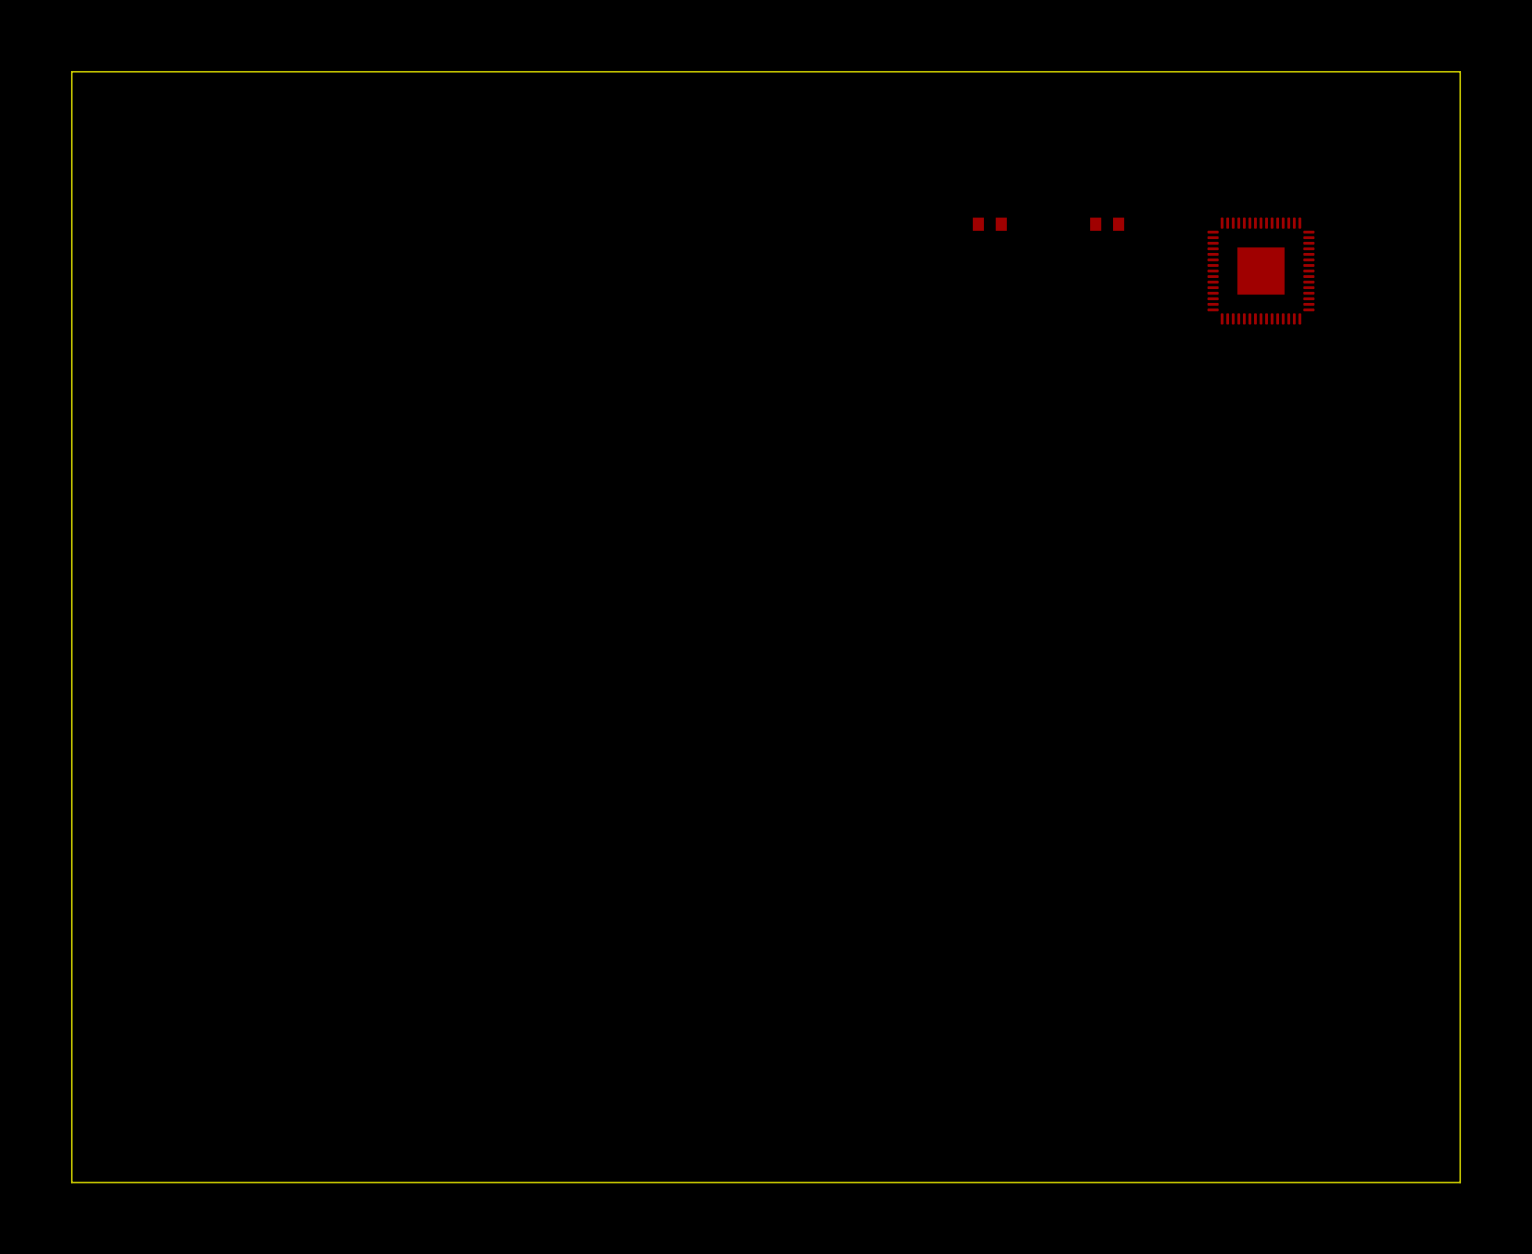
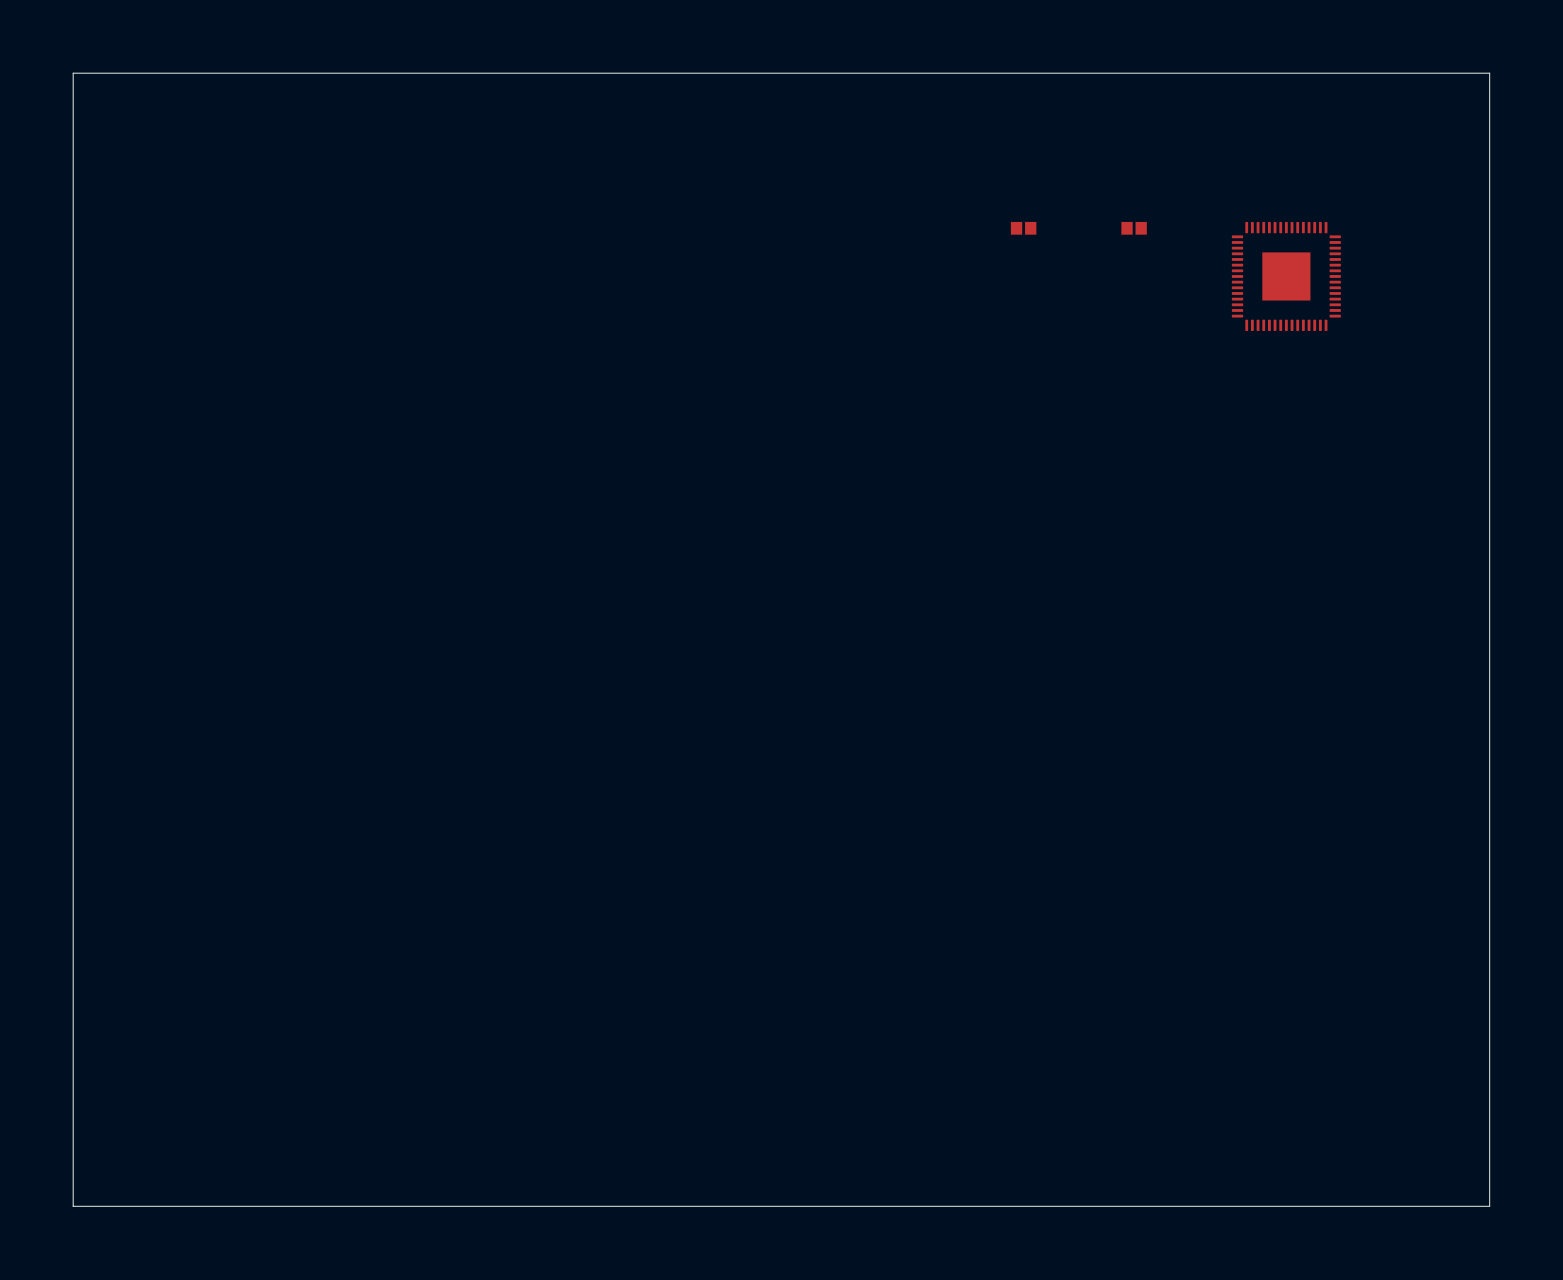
part footprint: [972, 217, 1007, 231] -> [1010, 221, 1037, 235]
part footprint: [1090, 217, 1125, 231] -> [1121, 221, 1147, 235]

